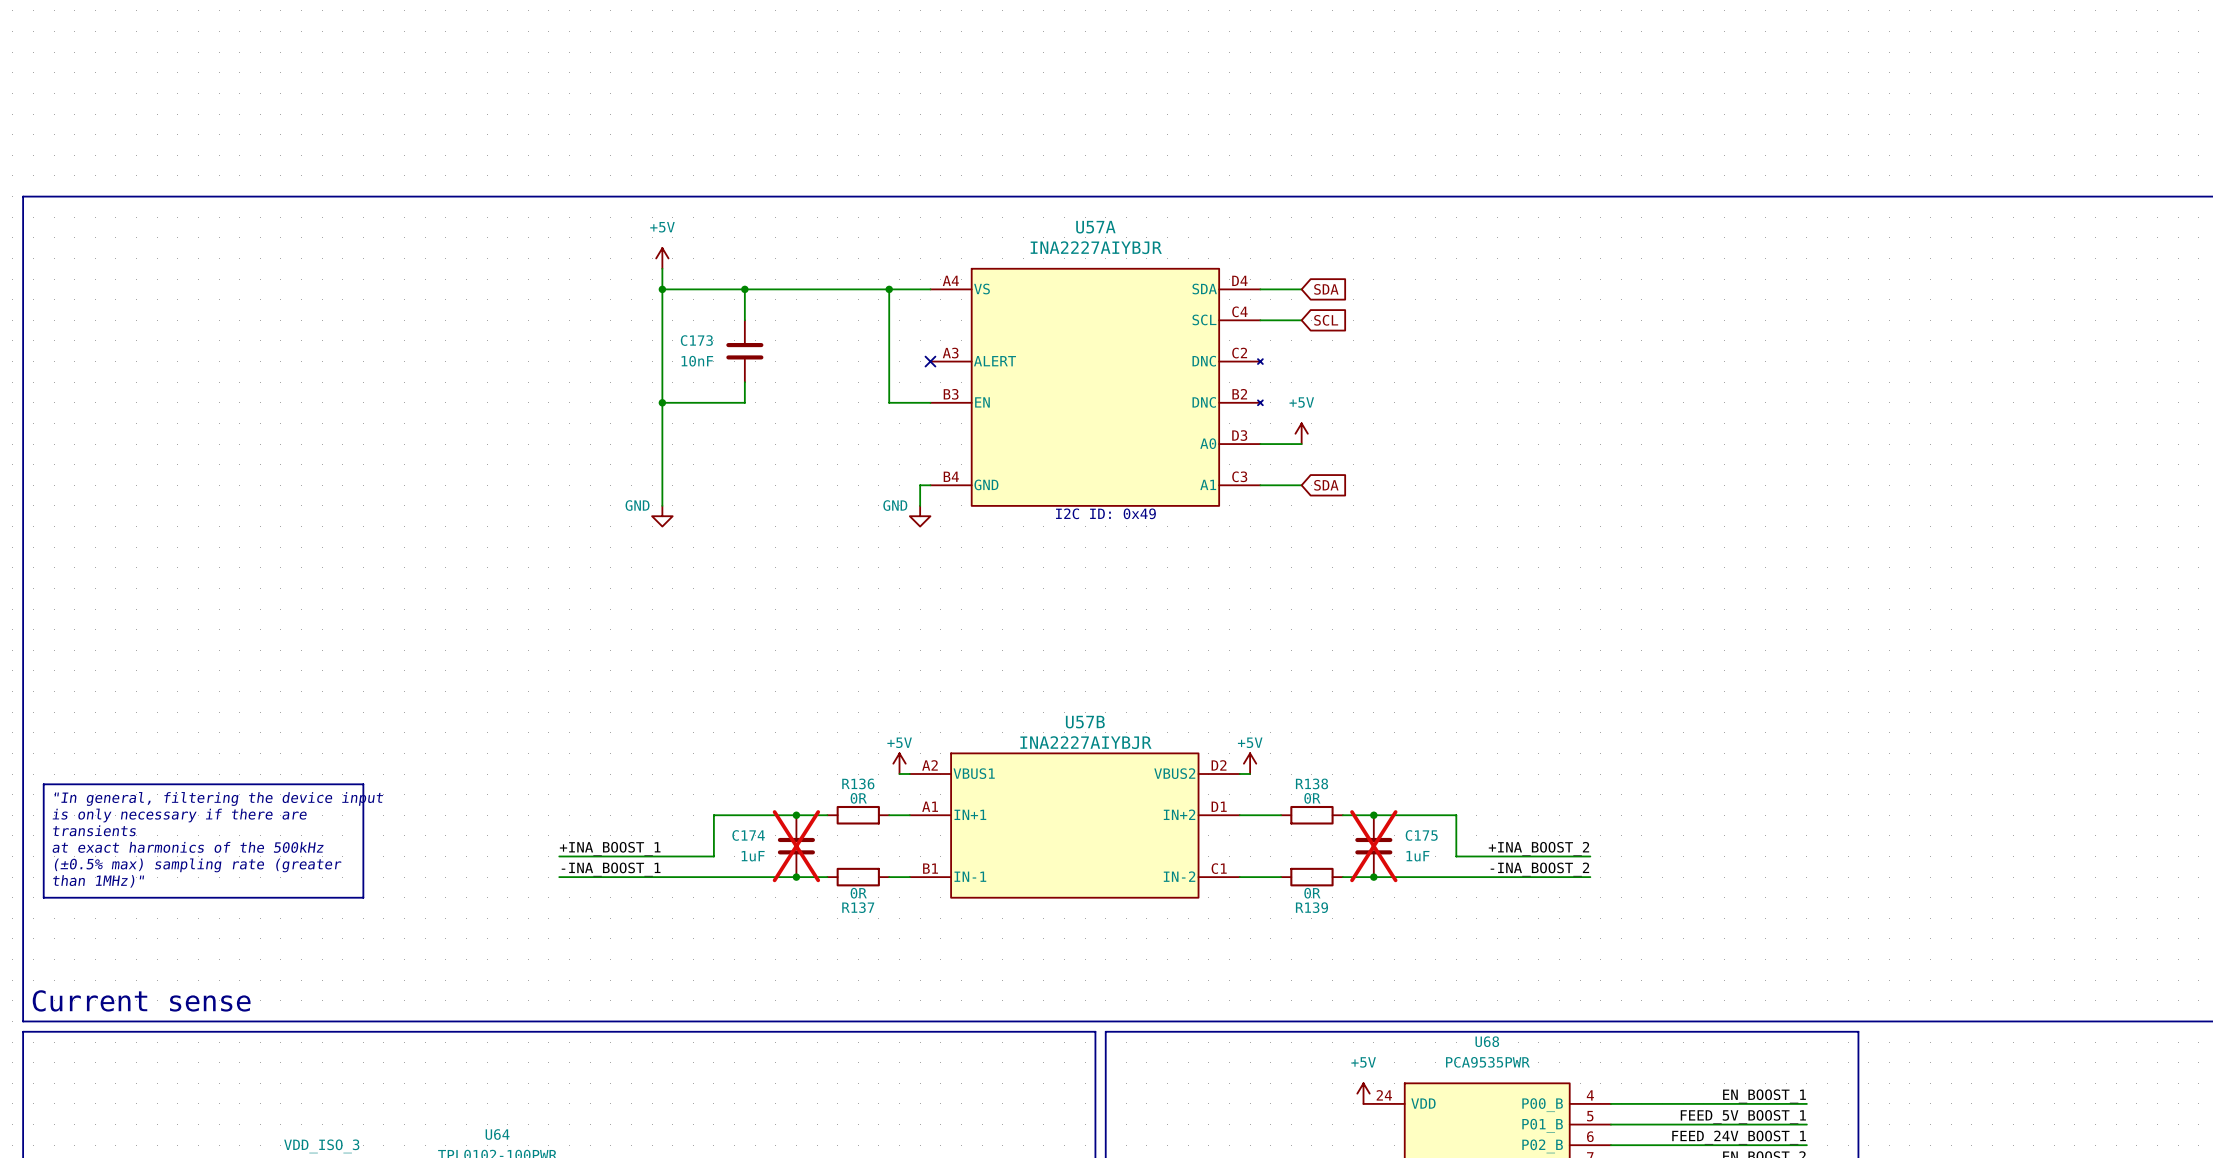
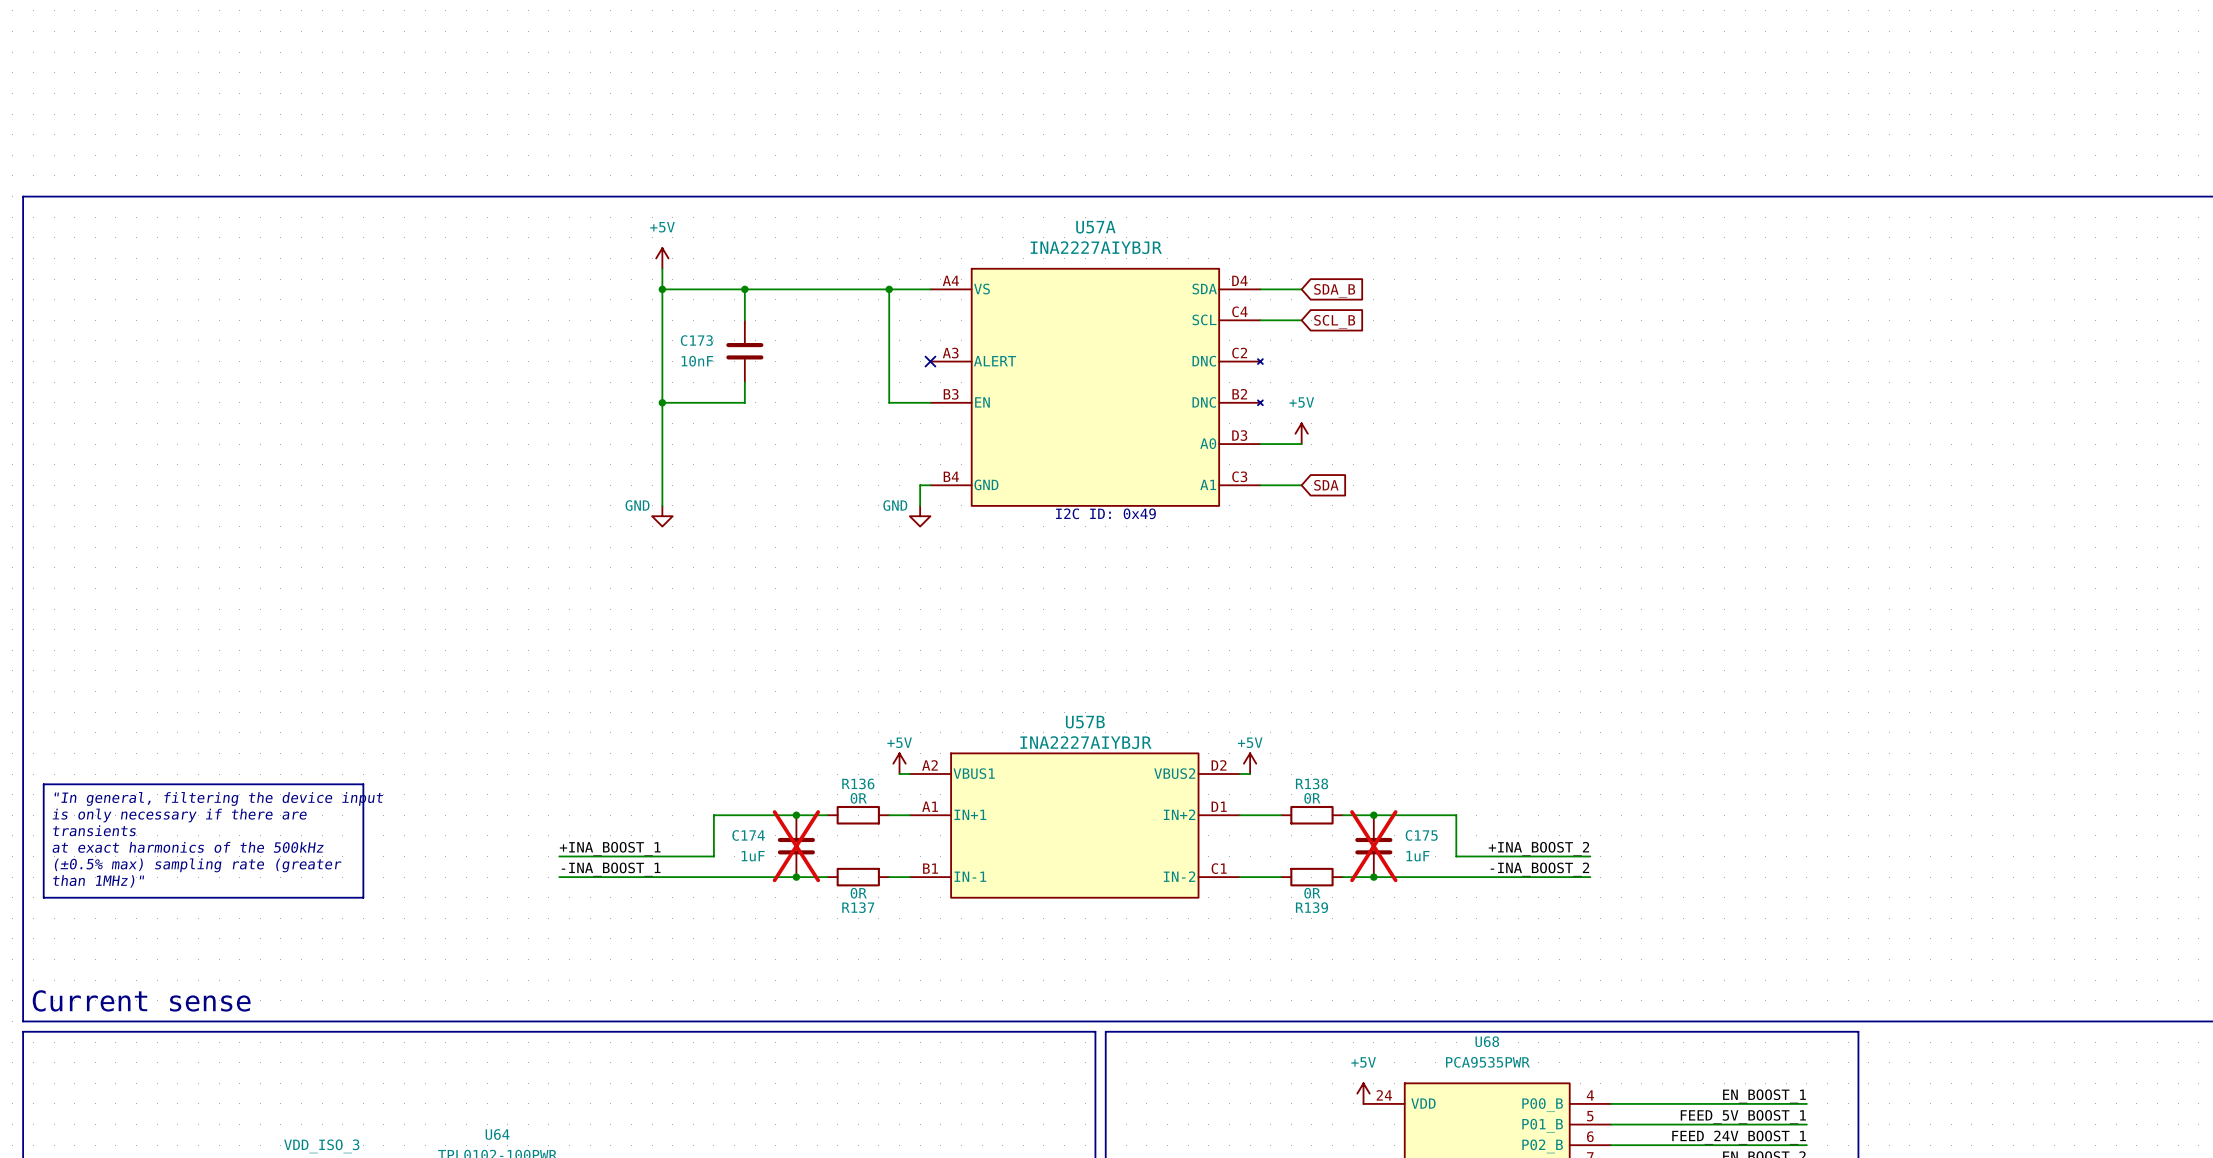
global label: SDA (1326, 289) -> SDA_B (1334, 290)
global label: SCL (1326, 320) -> SCL_B (1334, 321)

